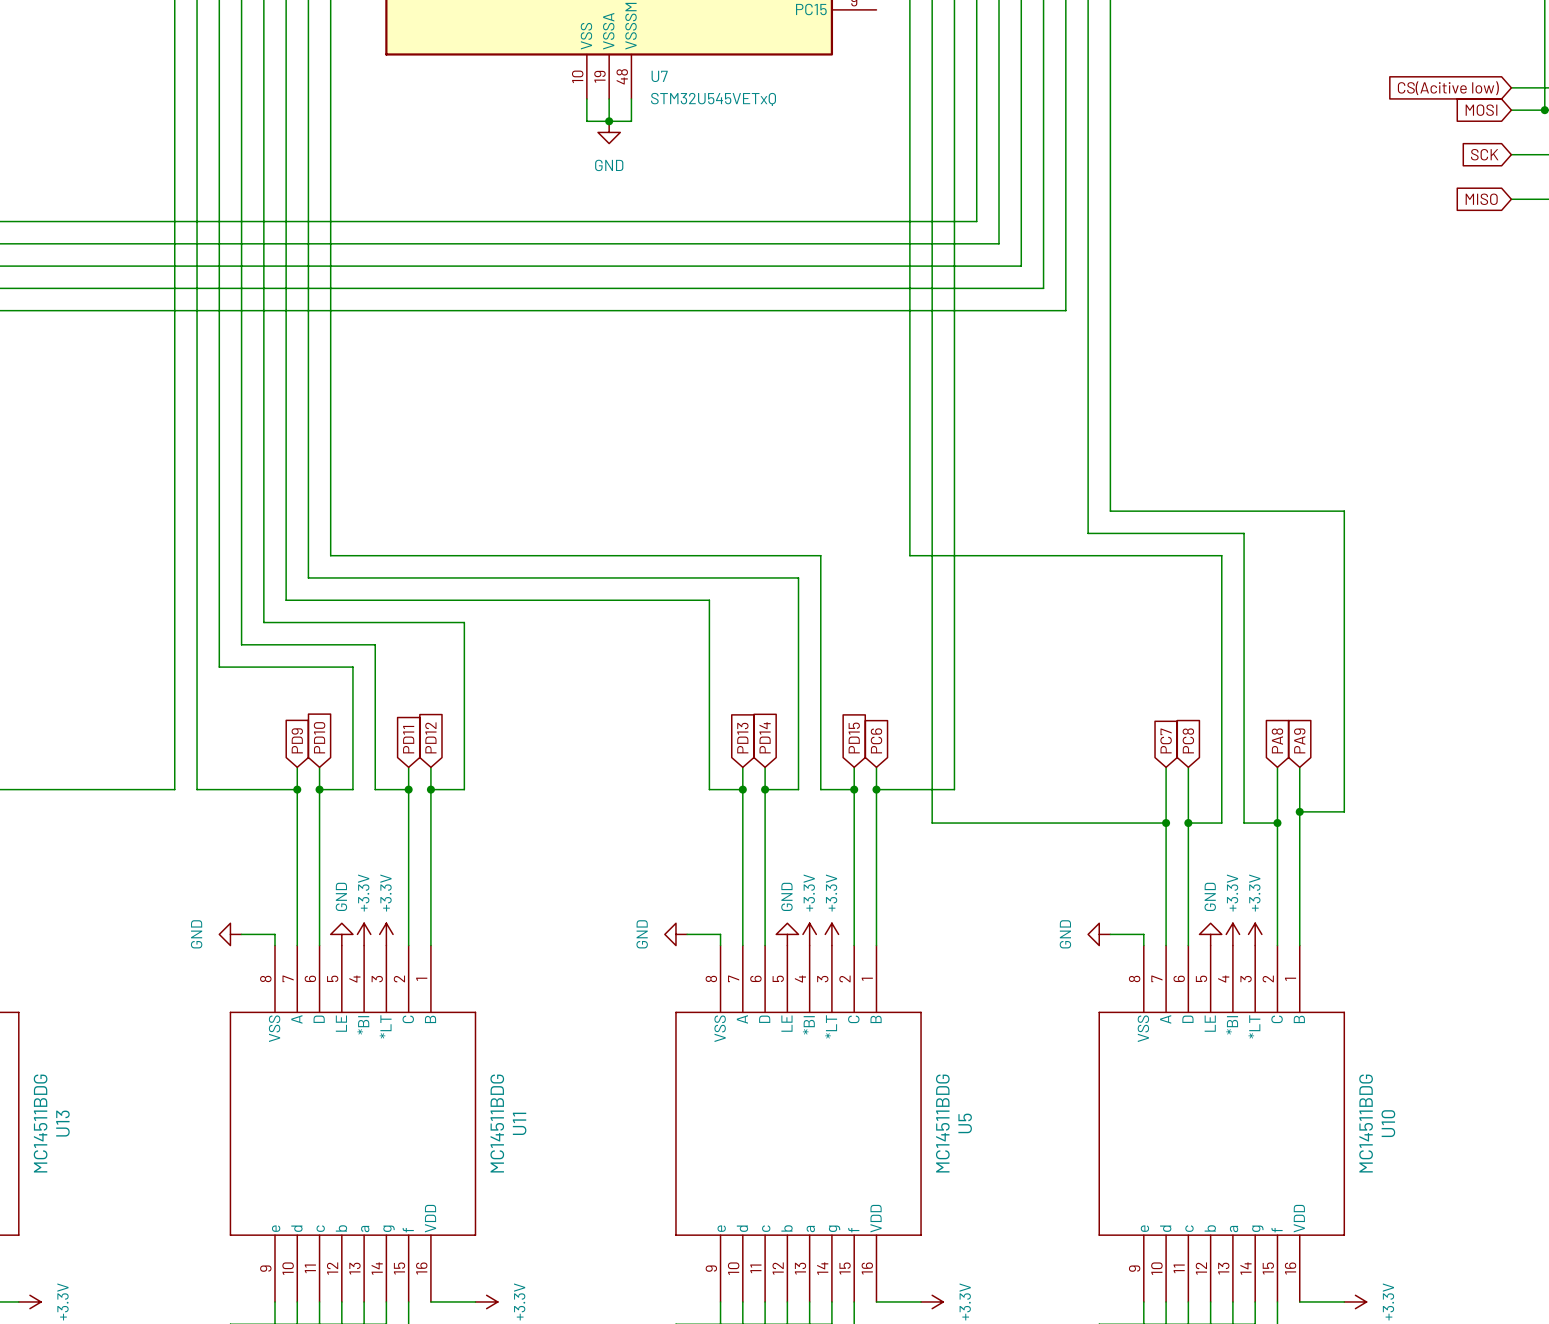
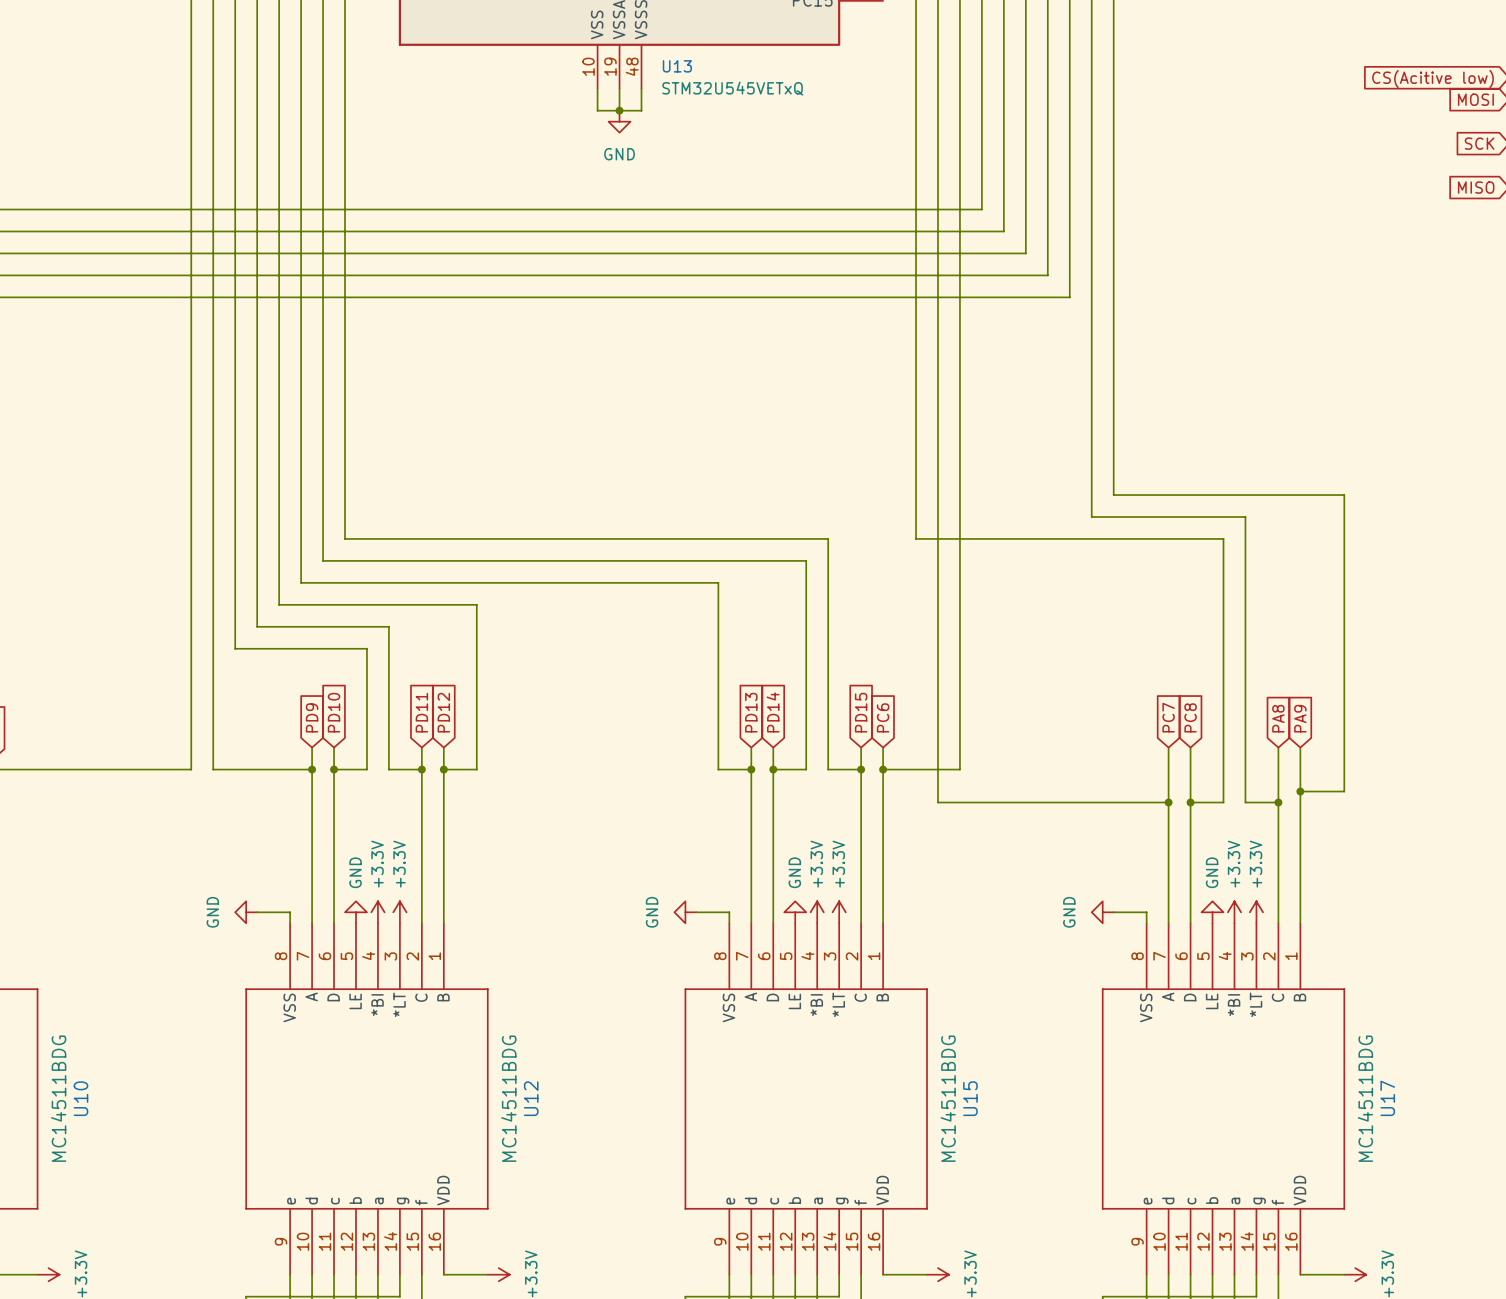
U7 name: U7 (659, 76) -> U13 (677, 66)
U13 name: U13 (62, 1123) -> U10 (80, 1098)
U11 name: U11 (519, 1123) -> U12 (531, 1098)
U5 name: U5 (965, 1123) -> U15 (970, 1098)
U10 name: U10 (1388, 1123) -> U17 (1387, 1098)

